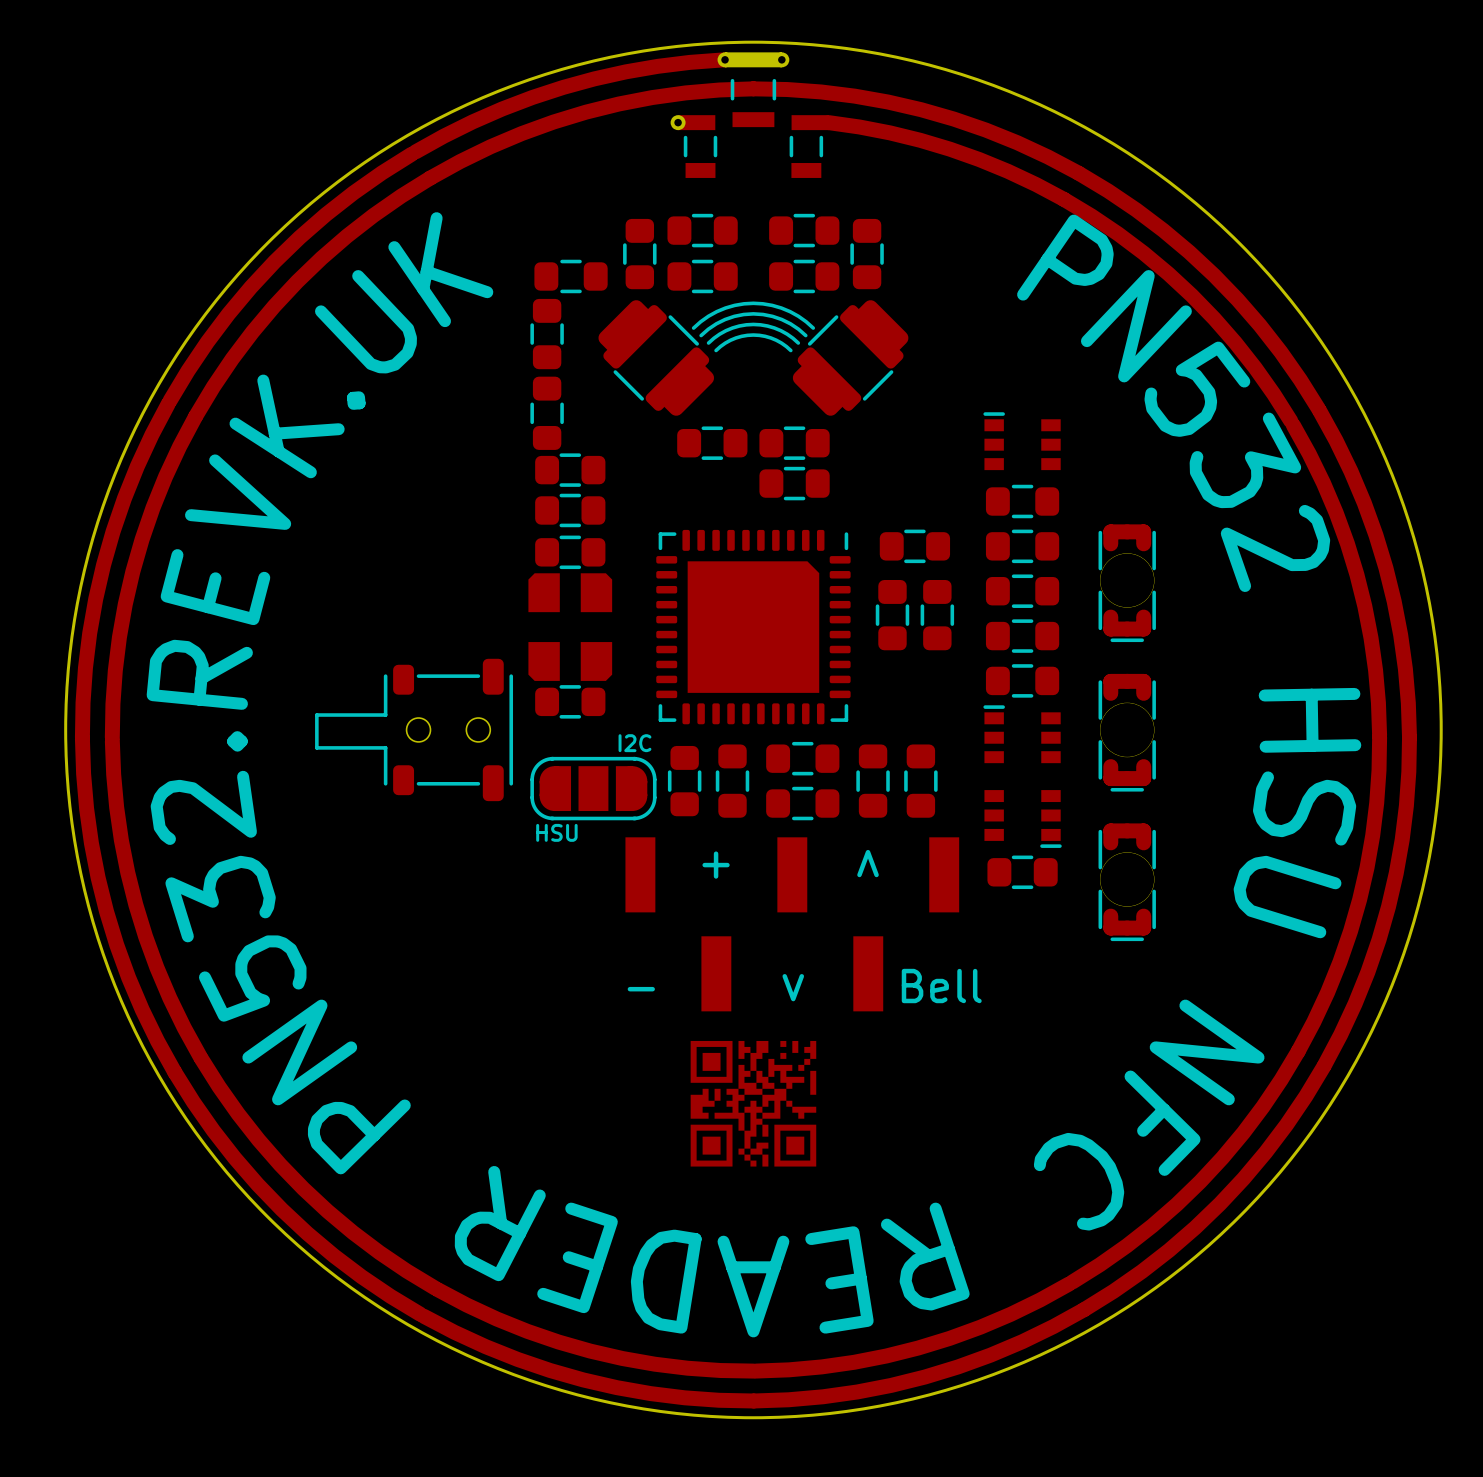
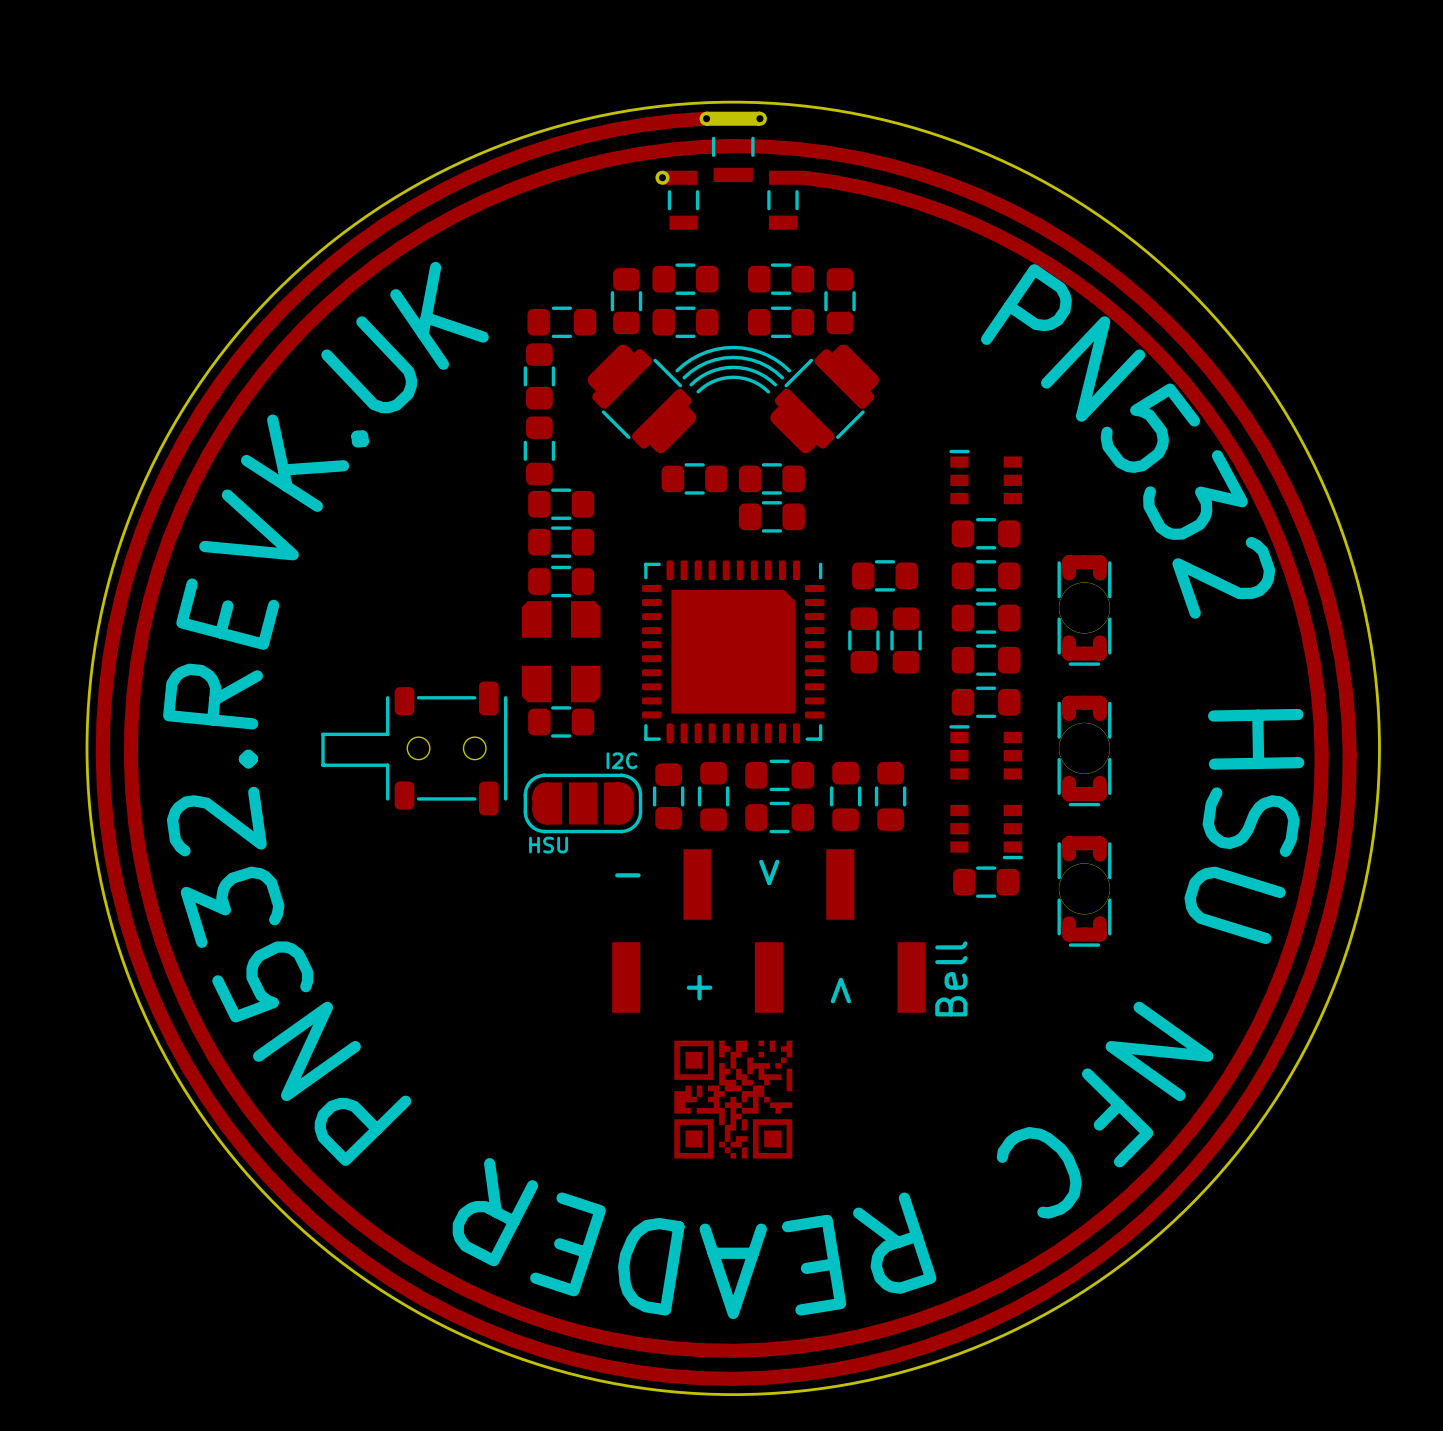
text position: > (868, 863) -> > (840, 990)
text position: + (716, 865) -> + (699, 987)
part rotation: 0° (792, 924) -> 180° (768, 931)
text rotation: 0° (941, 986) -> 90° counterclockwise (951, 978)
text position: < (793, 987) -> < (769, 872)
text position: - (641, 989) -> - (627, 875)

